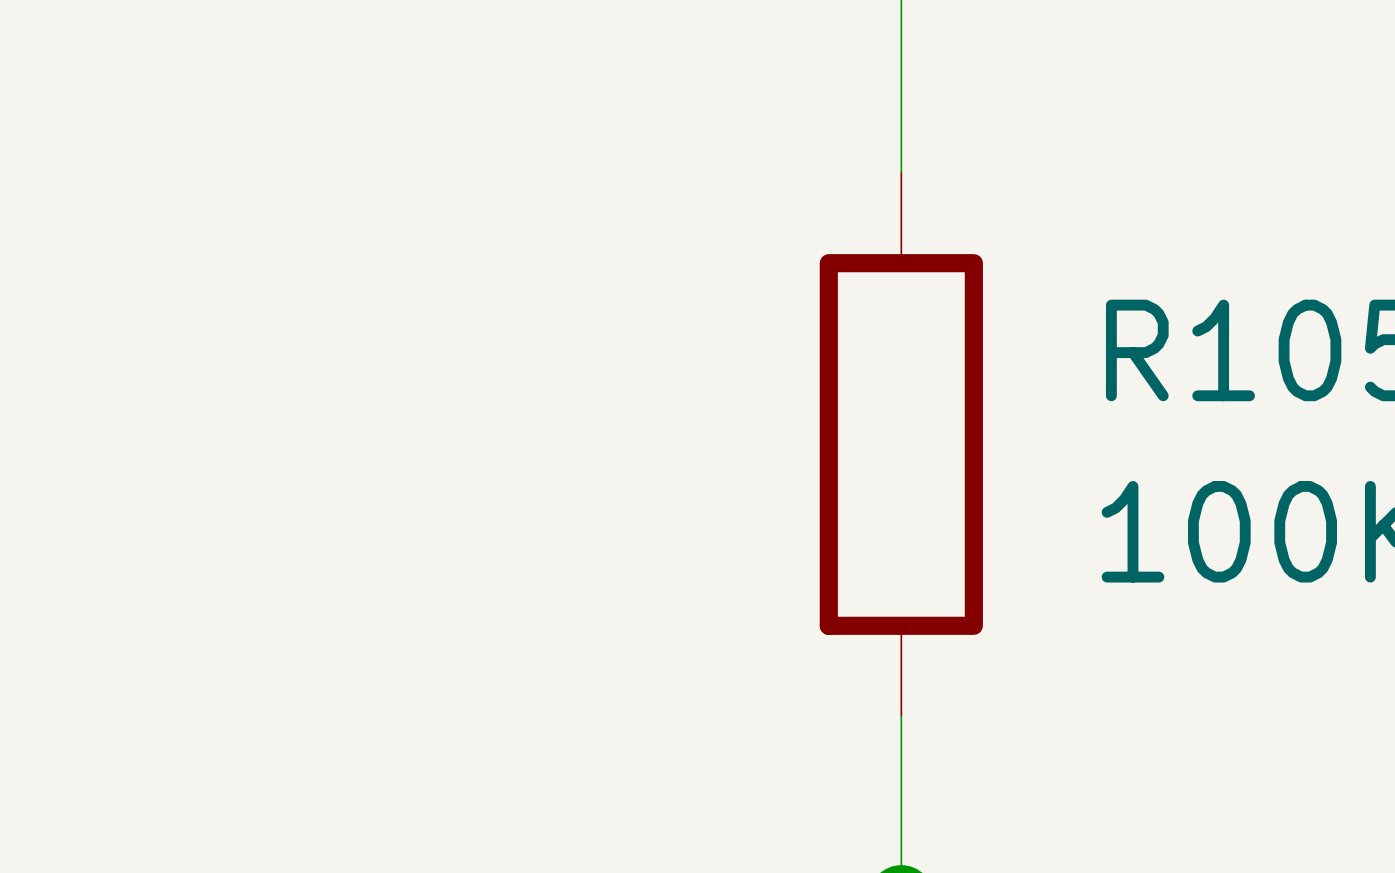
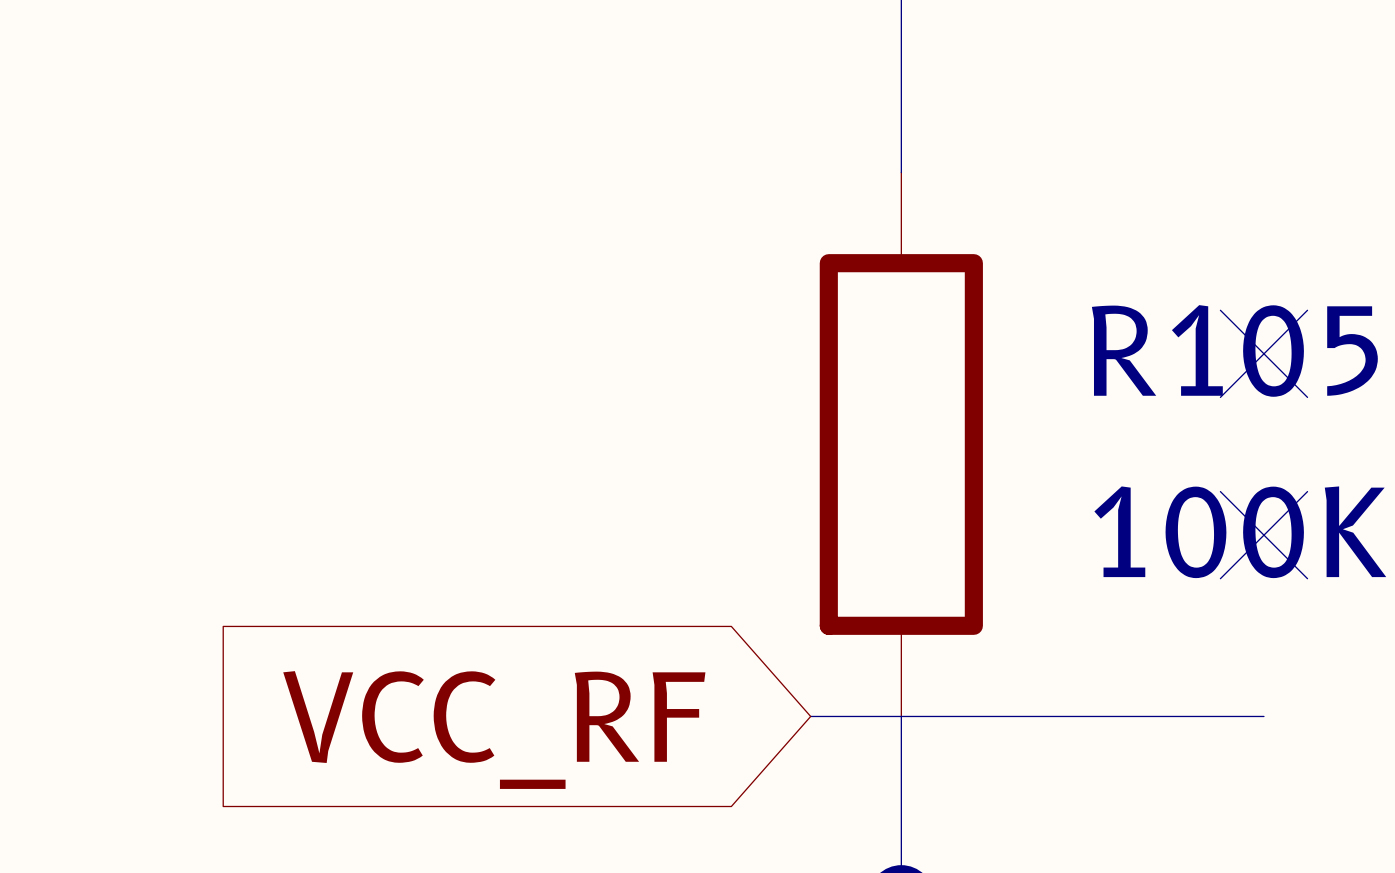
no-connect mark: none -> (1263, 353)
no-connect mark: none -> (1263, 535)
wire: none -> (810, 716) (1263, 716)
global label: none -> VCC_RF (494, 730)

